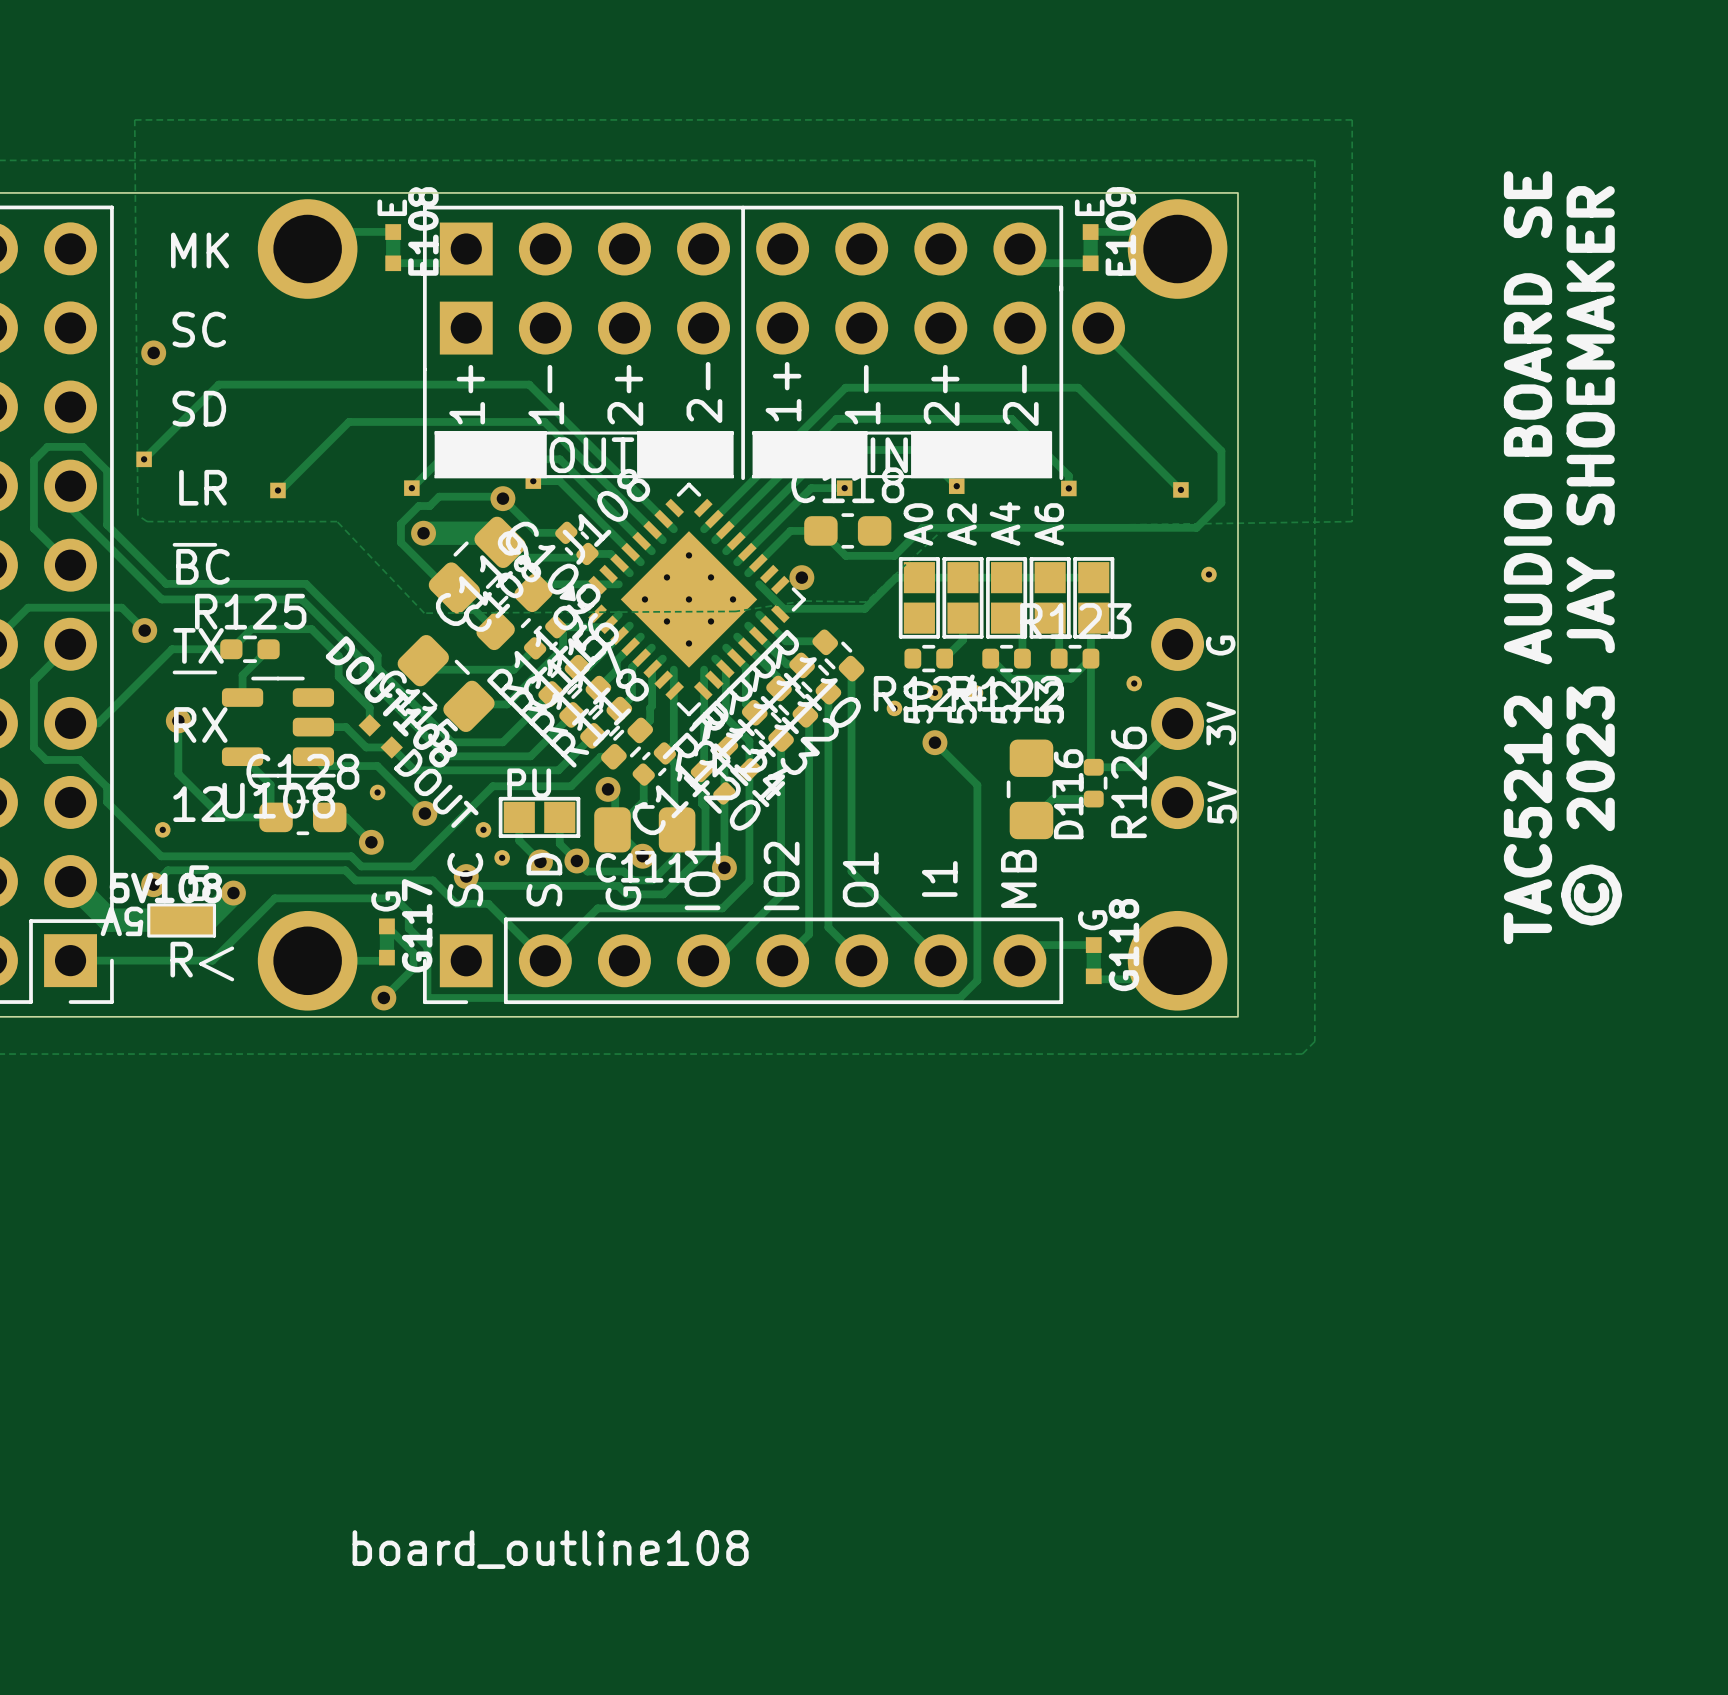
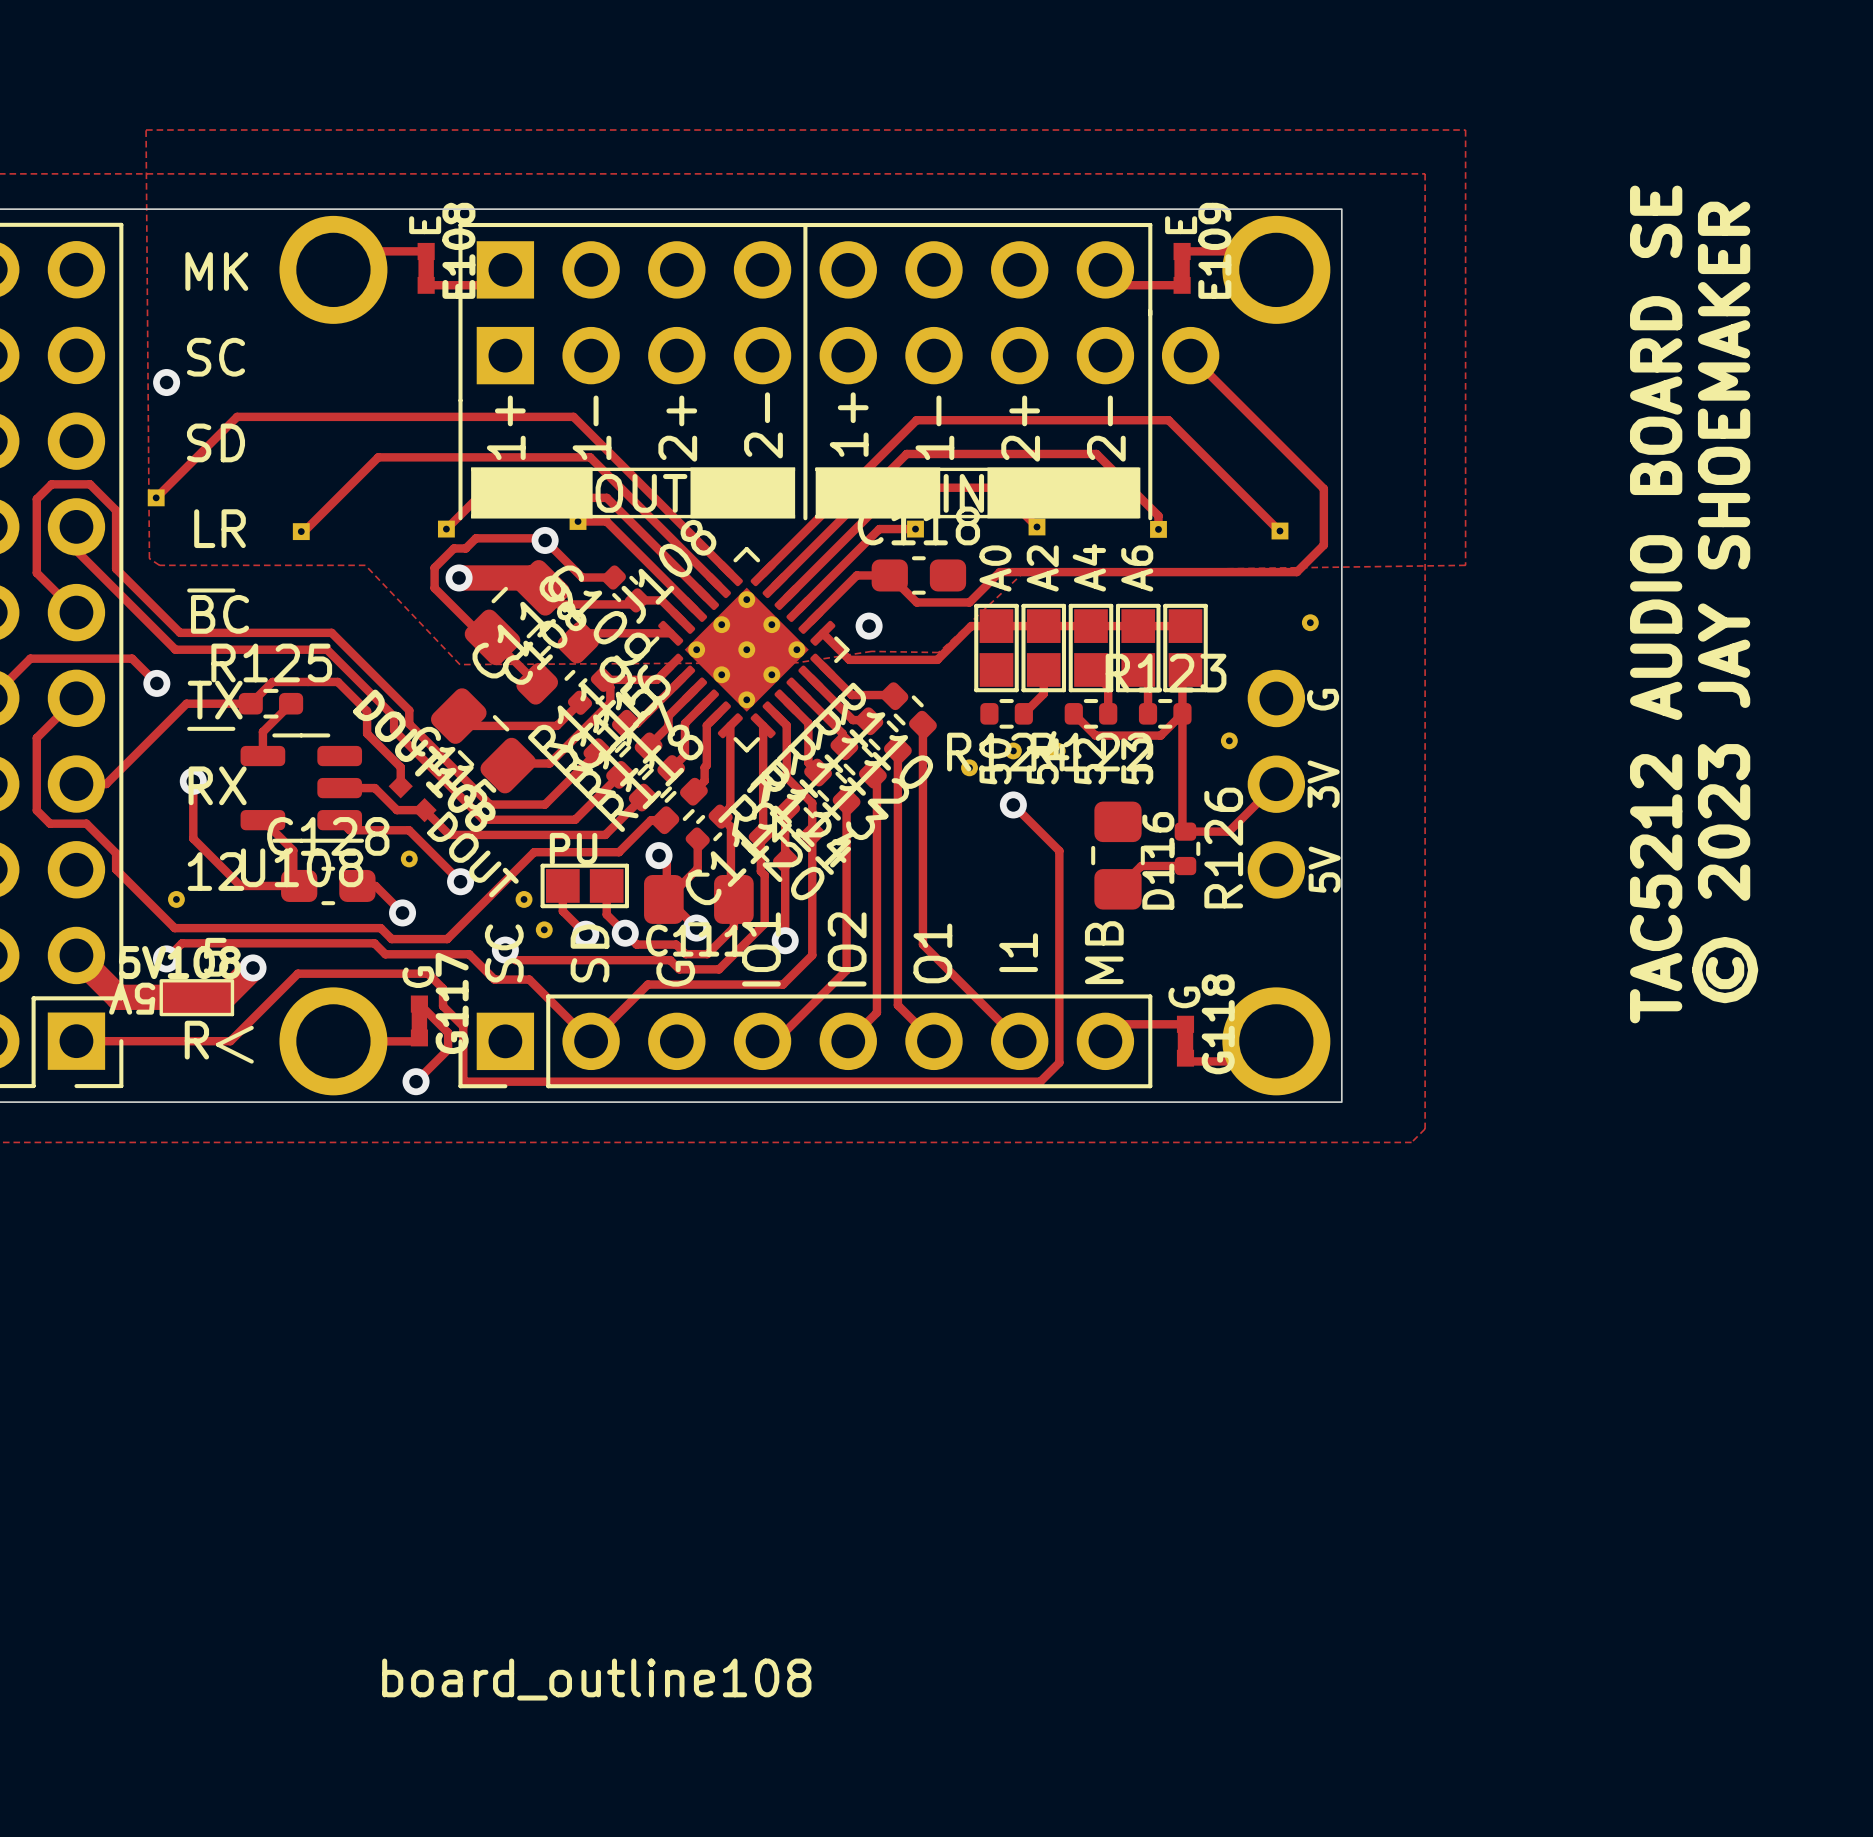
J108 footprint: [559, 482, 806, 717] -> [644, 546, 850, 753]

